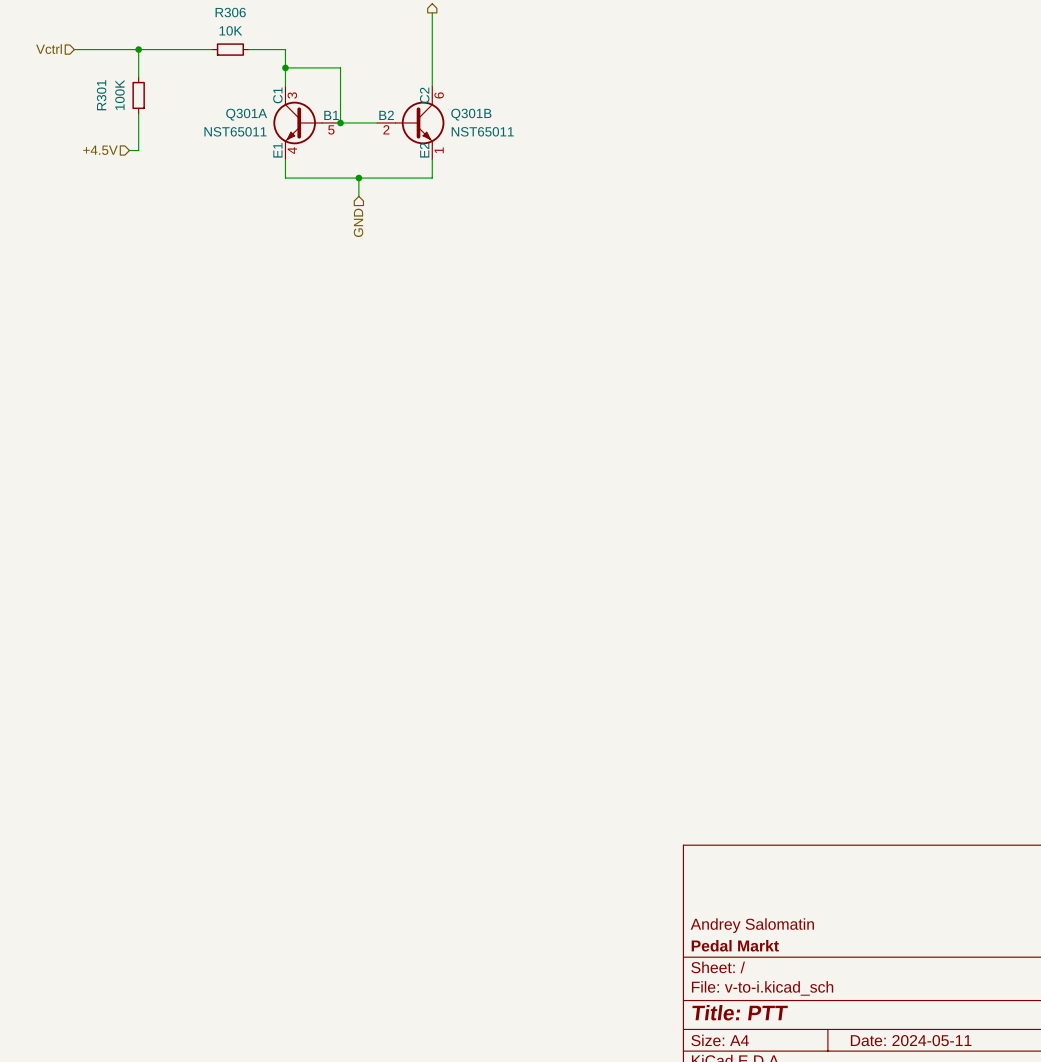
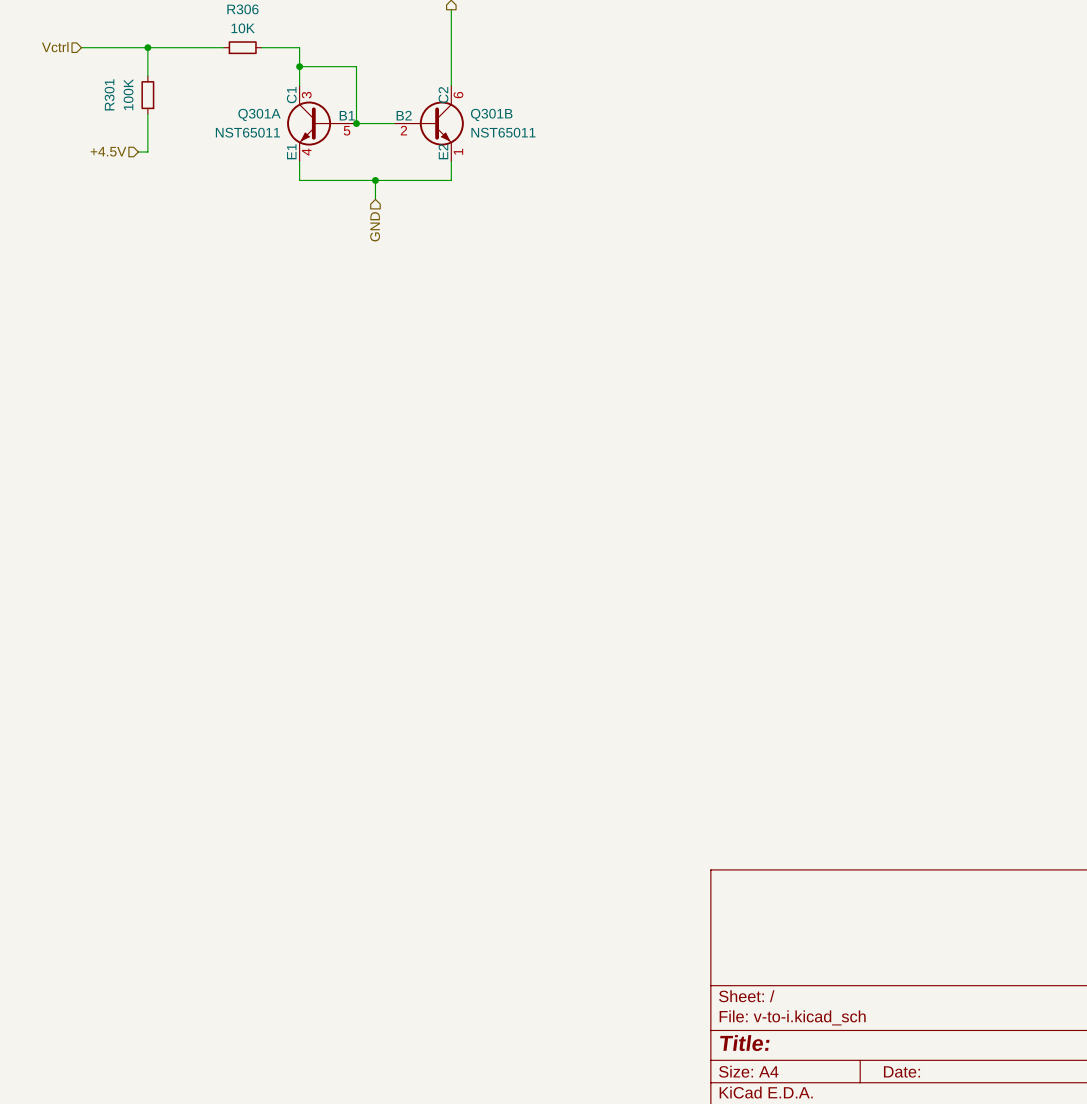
title block: Andrey Salomatin (752, 925) -> none
title block: Pedal Markt (735, 945) -> none
title block: Title: PTT (740, 1012) -> Title: (744, 1043)
title block: Date: 2024-05-11 (911, 1040) -> Date: (901, 1071)

